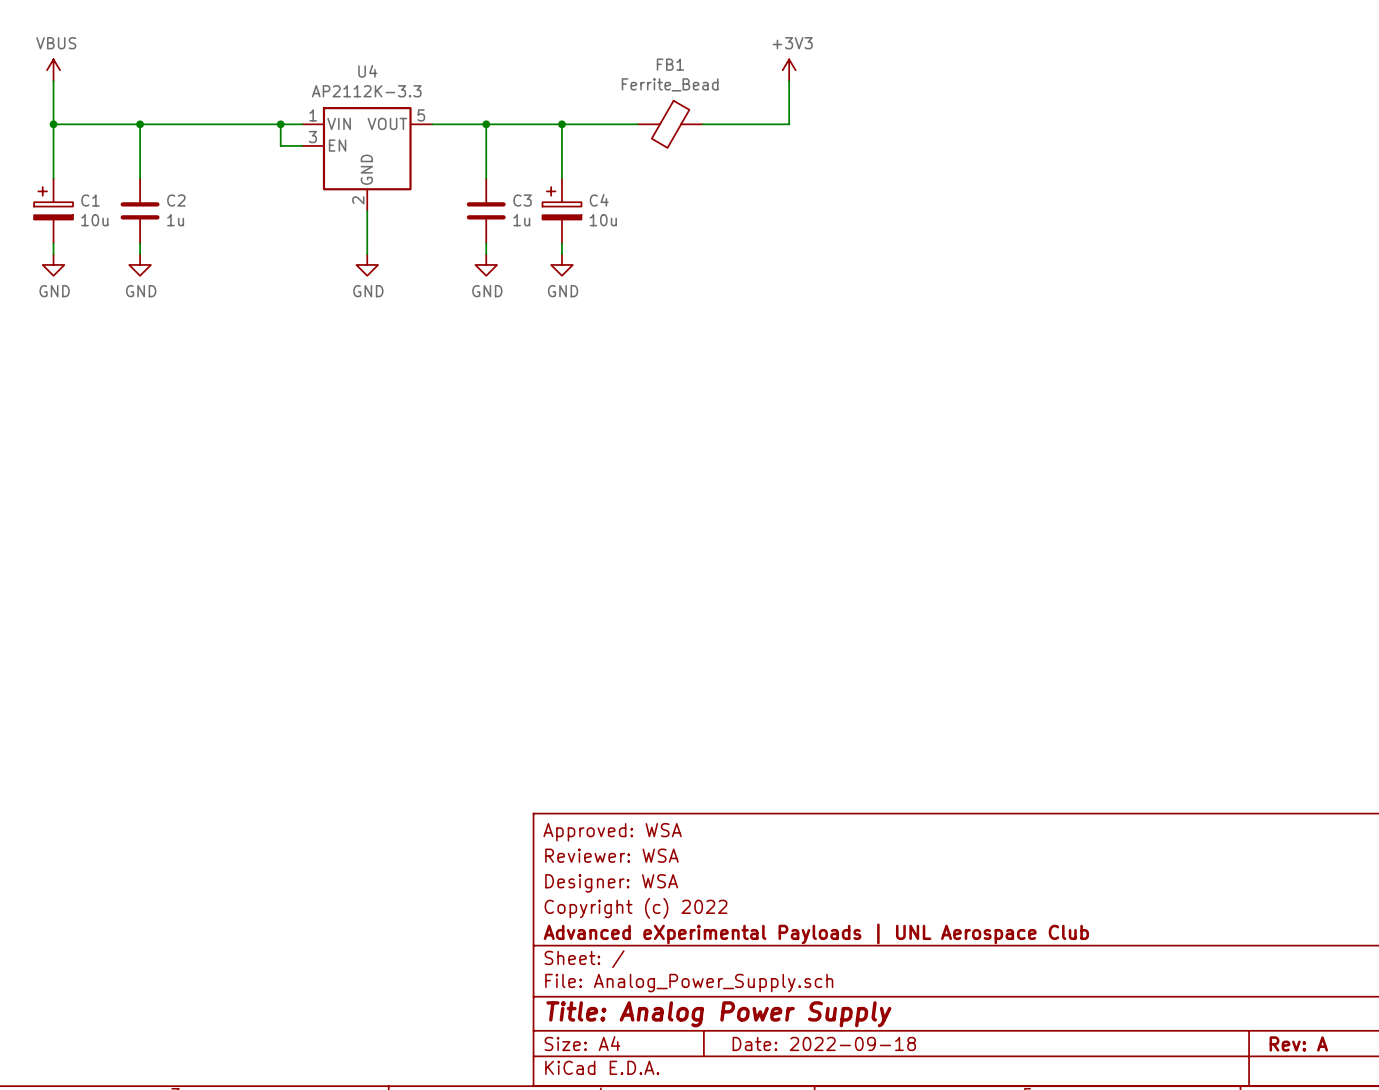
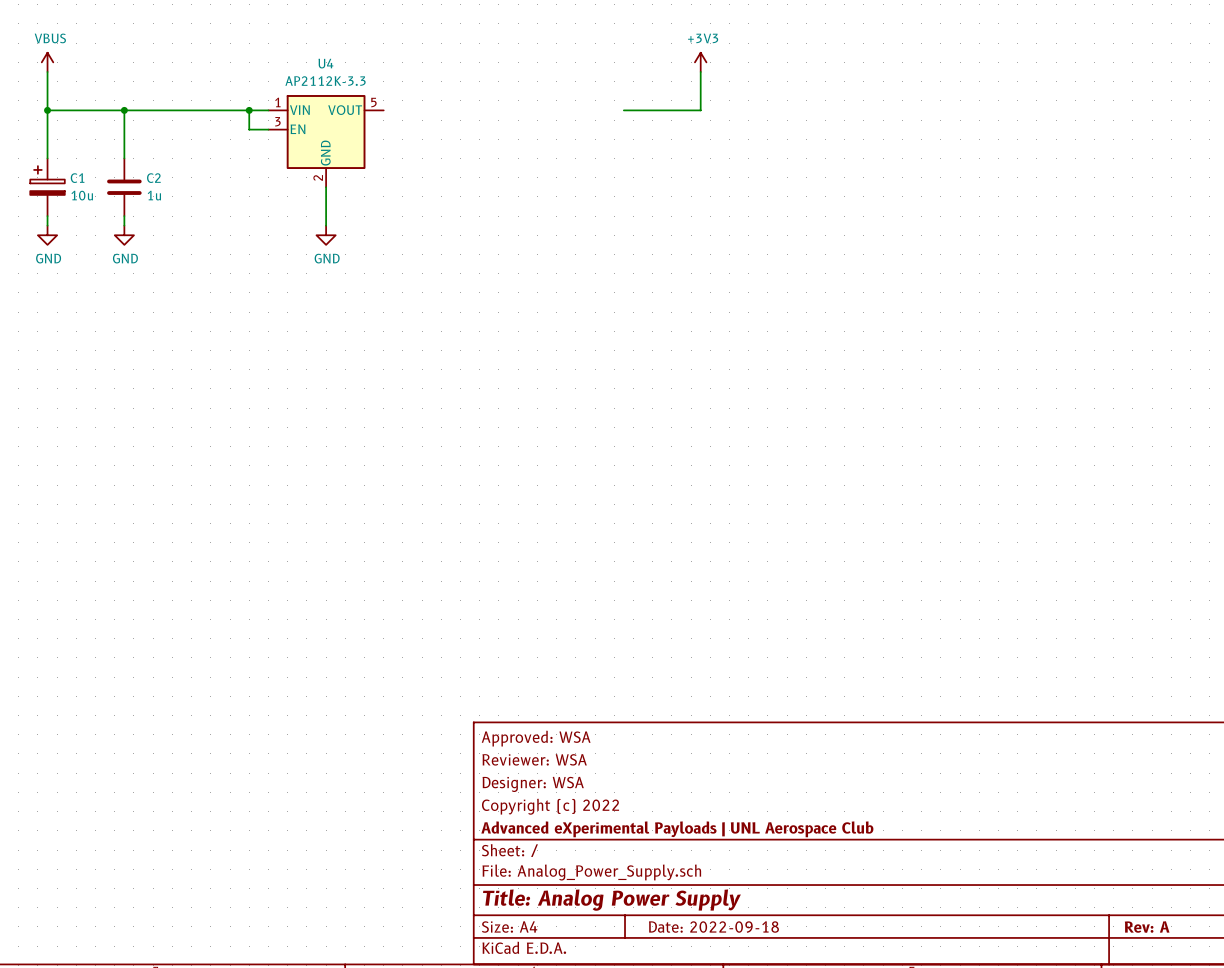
wire: (432, 124) (637, 124) -> none
wire: (486, 124) (486, 178) -> none
junction: (486, 124) -> none
wire: (561, 124) (561, 178) -> none
junction: (561, 124) -> none
FB1: Ferrite_Bead (670, 124) -> none
C3: 1u (486, 210) -> none
C4: 10u (561, 210) -> none
wire: (486, 243) (486, 254) -> none
wire: (561, 243) (561, 254) -> none
power symbol: GND (486, 264) -> none
power symbol: GND (561, 264) -> none

